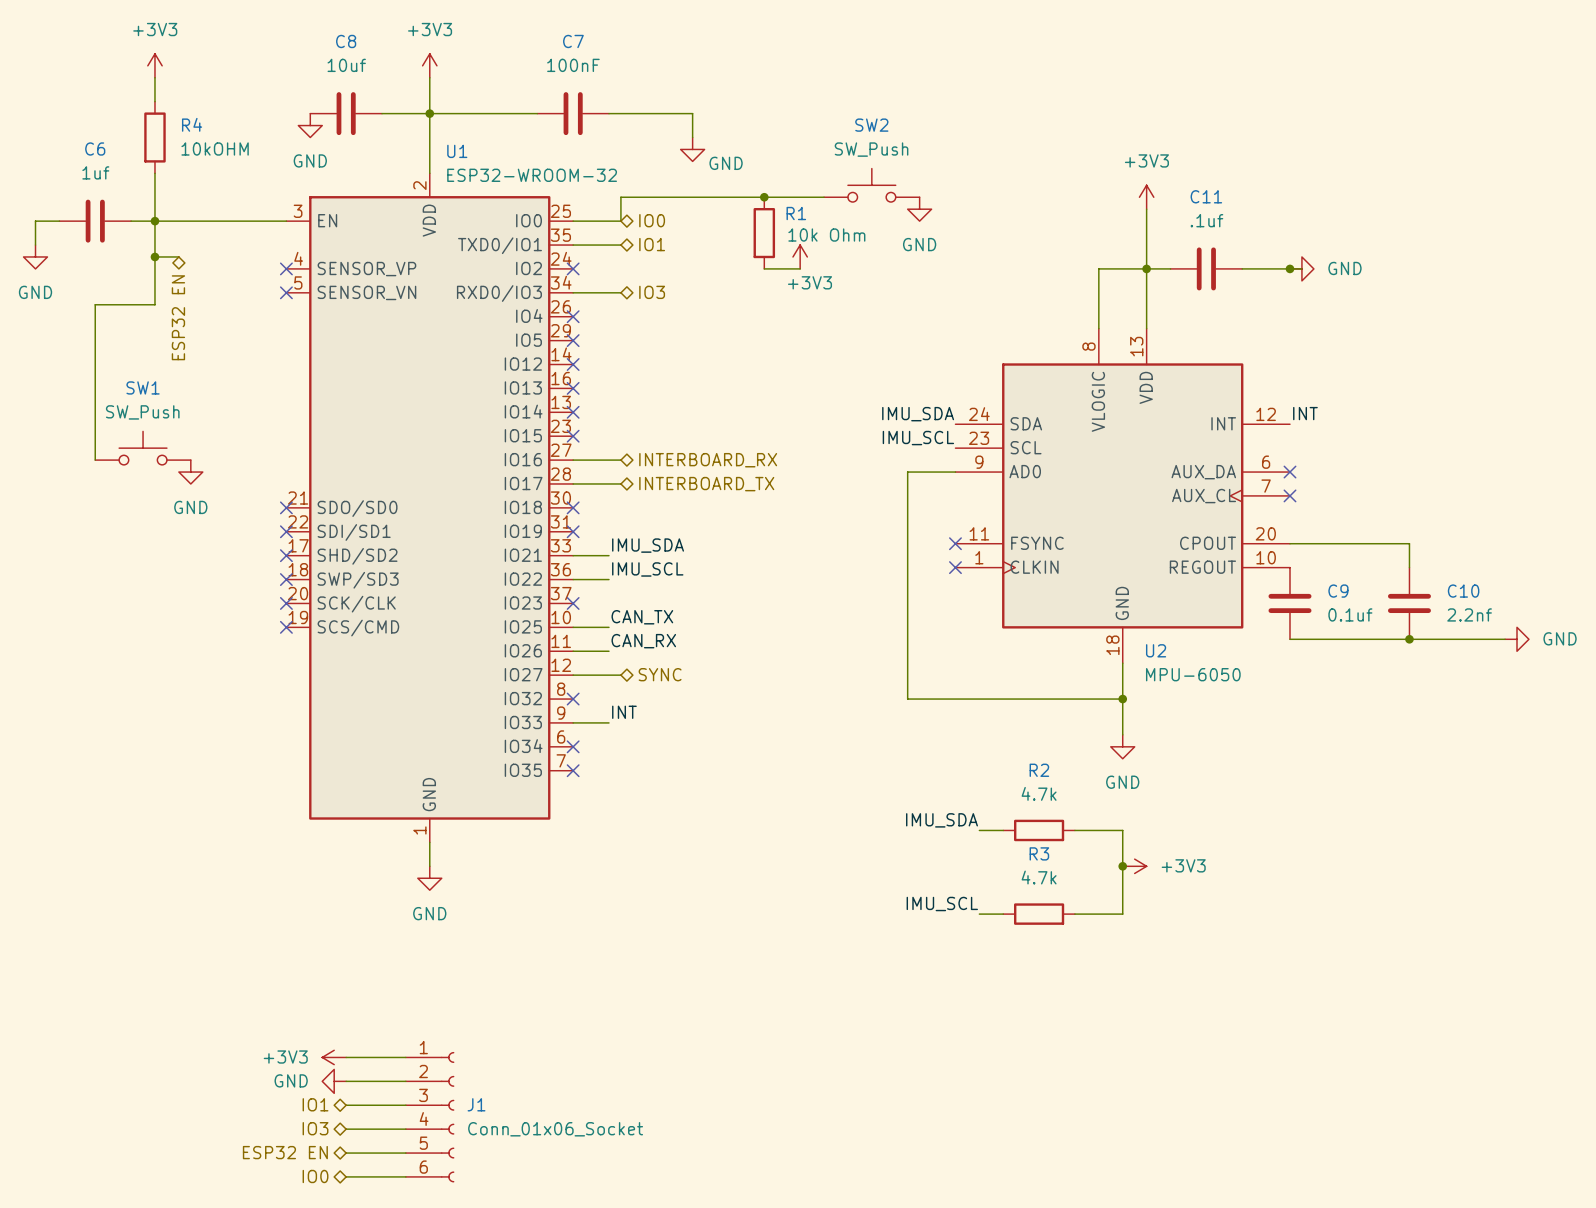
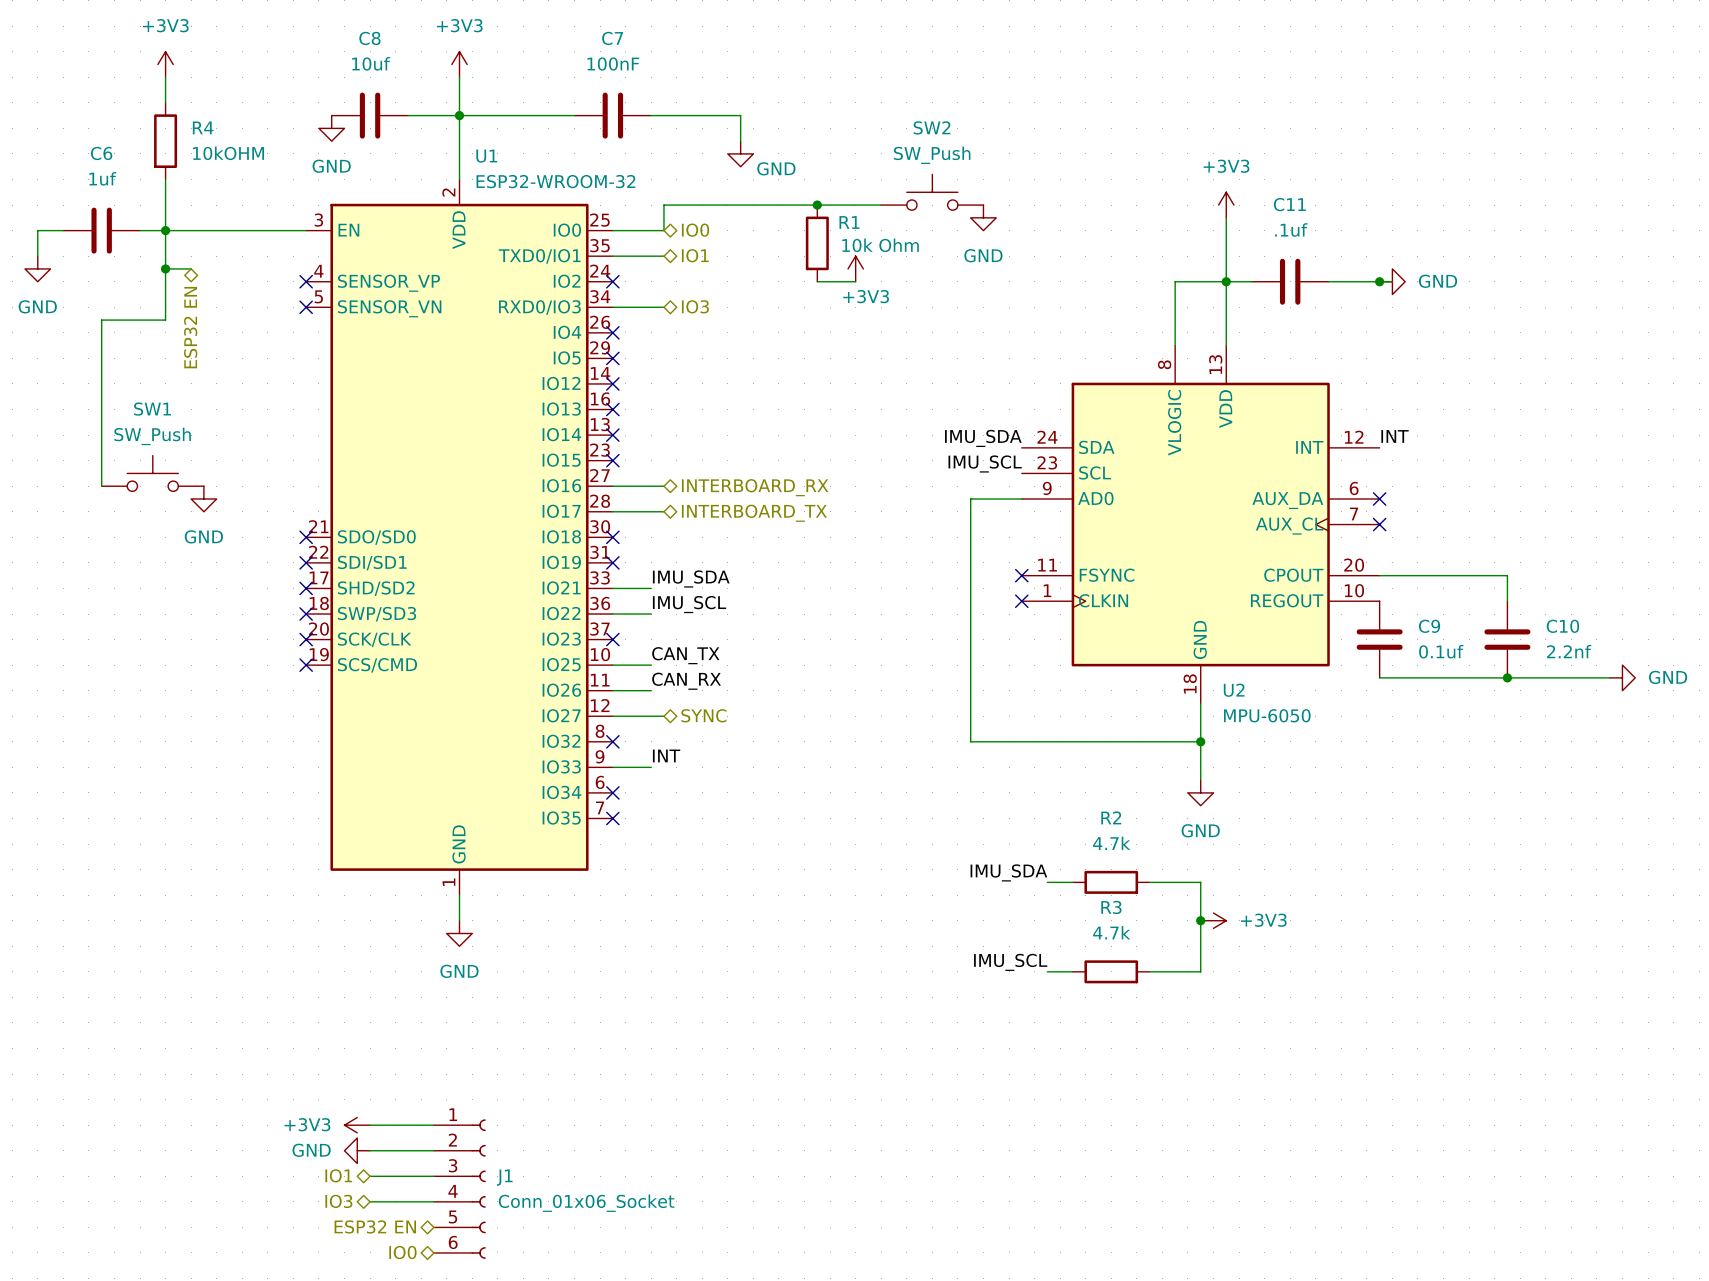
hierarchical label position: ESP32 EN (285, 1152) -> ESP32 EN (375, 1226)
wire: (346, 1153) (405, 1153) -> none
hierarchical label position: IO0 (315, 1176) -> IO0 (402, 1252)
wire: (346, 1176) (405, 1176) -> none

